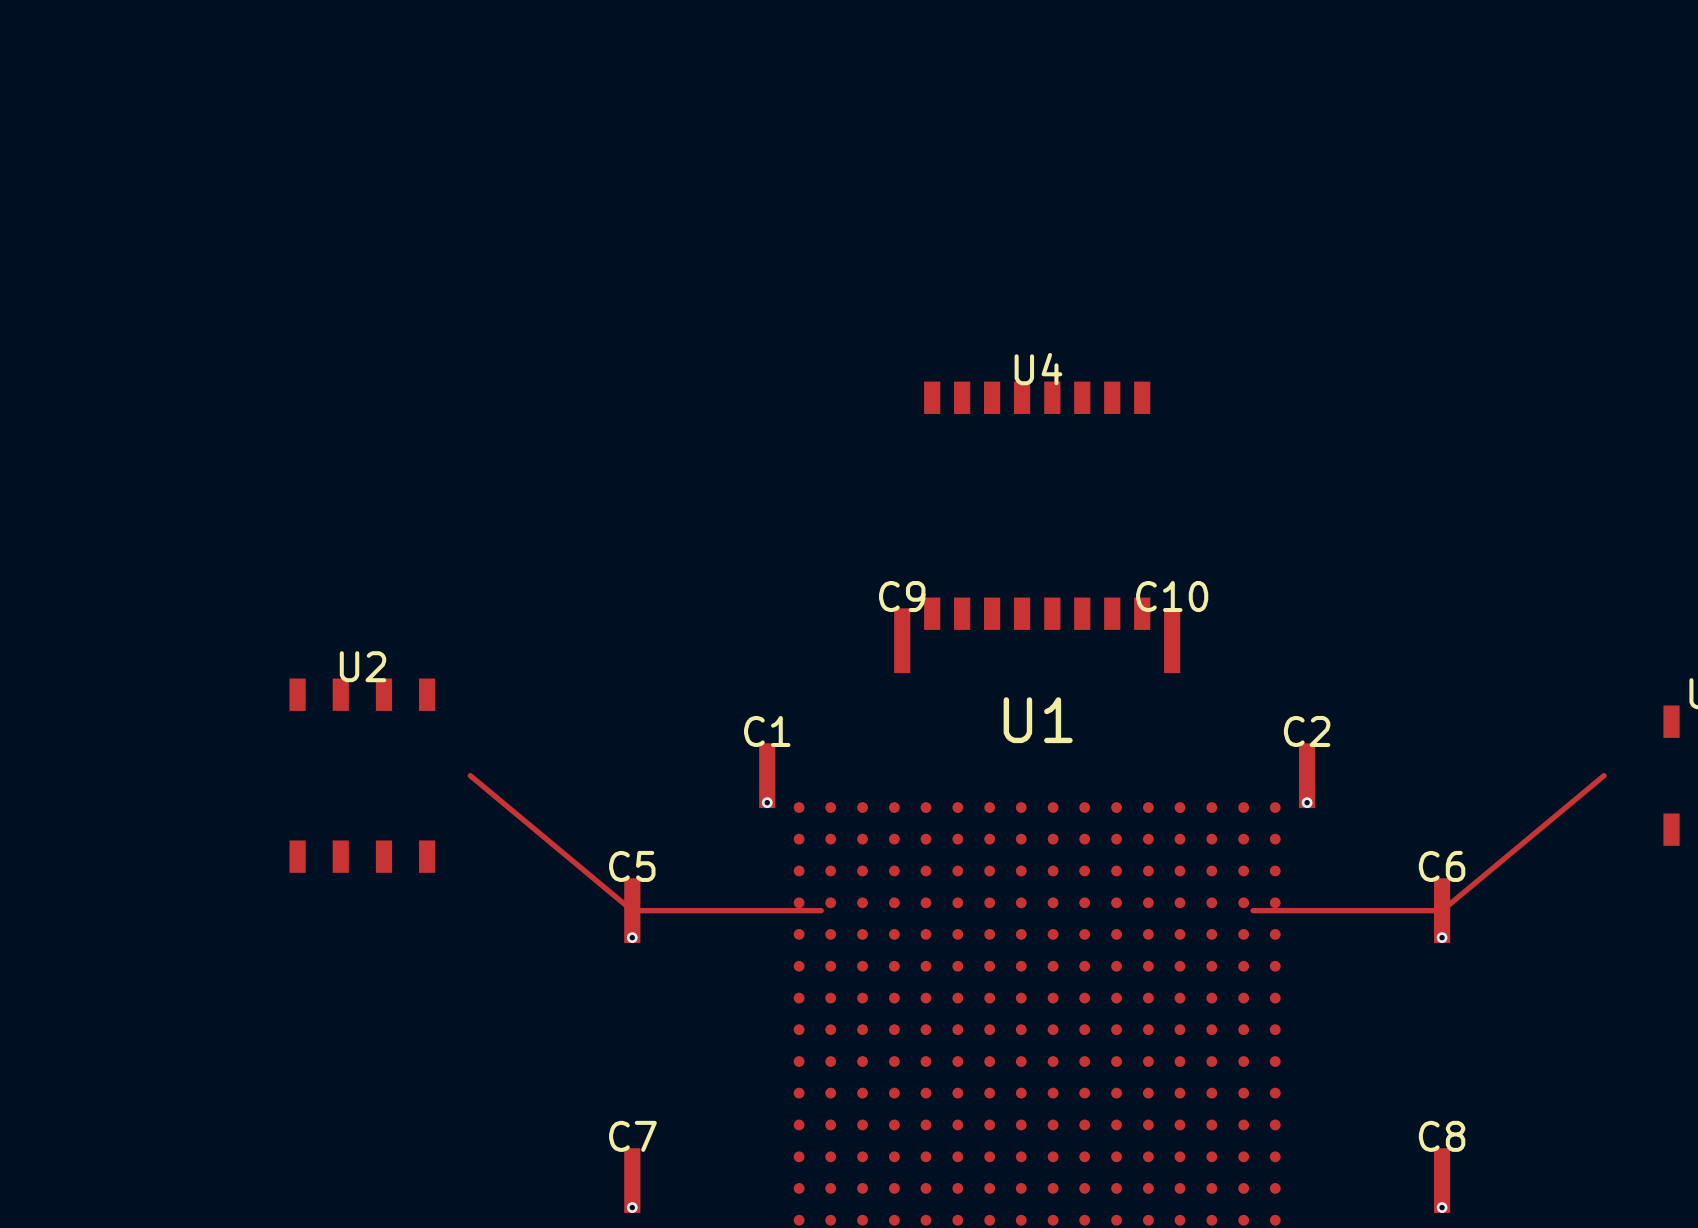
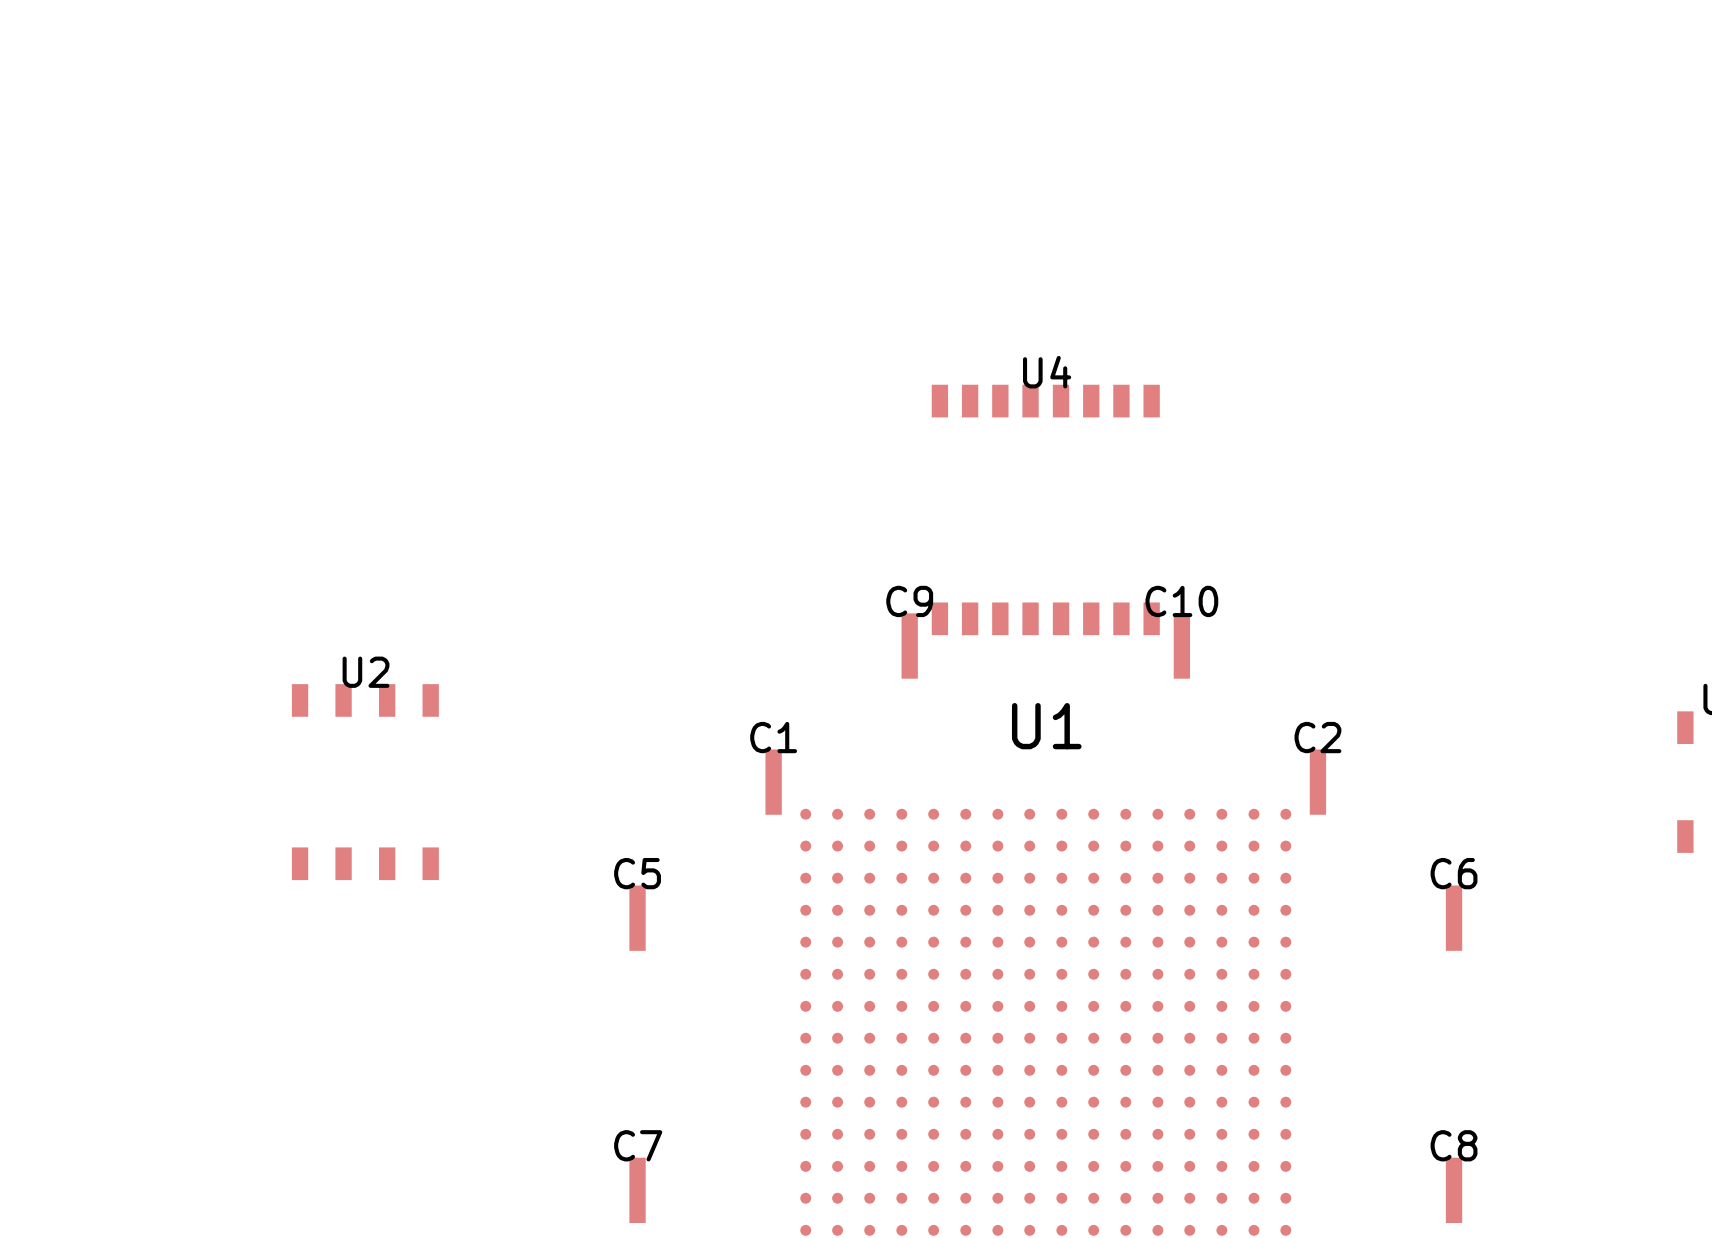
track: (470, 775) (632, 910) (821, 910) -> none
track: (1604, 775) (1442, 910) (1253, 910) -> none
via: (767, 802) -> none
via: (1307, 802) -> none
via: (632, 937) -> none
via: (1442, 937) -> none
via: (632, 1207) -> none
via: (1442, 1207) -> none

